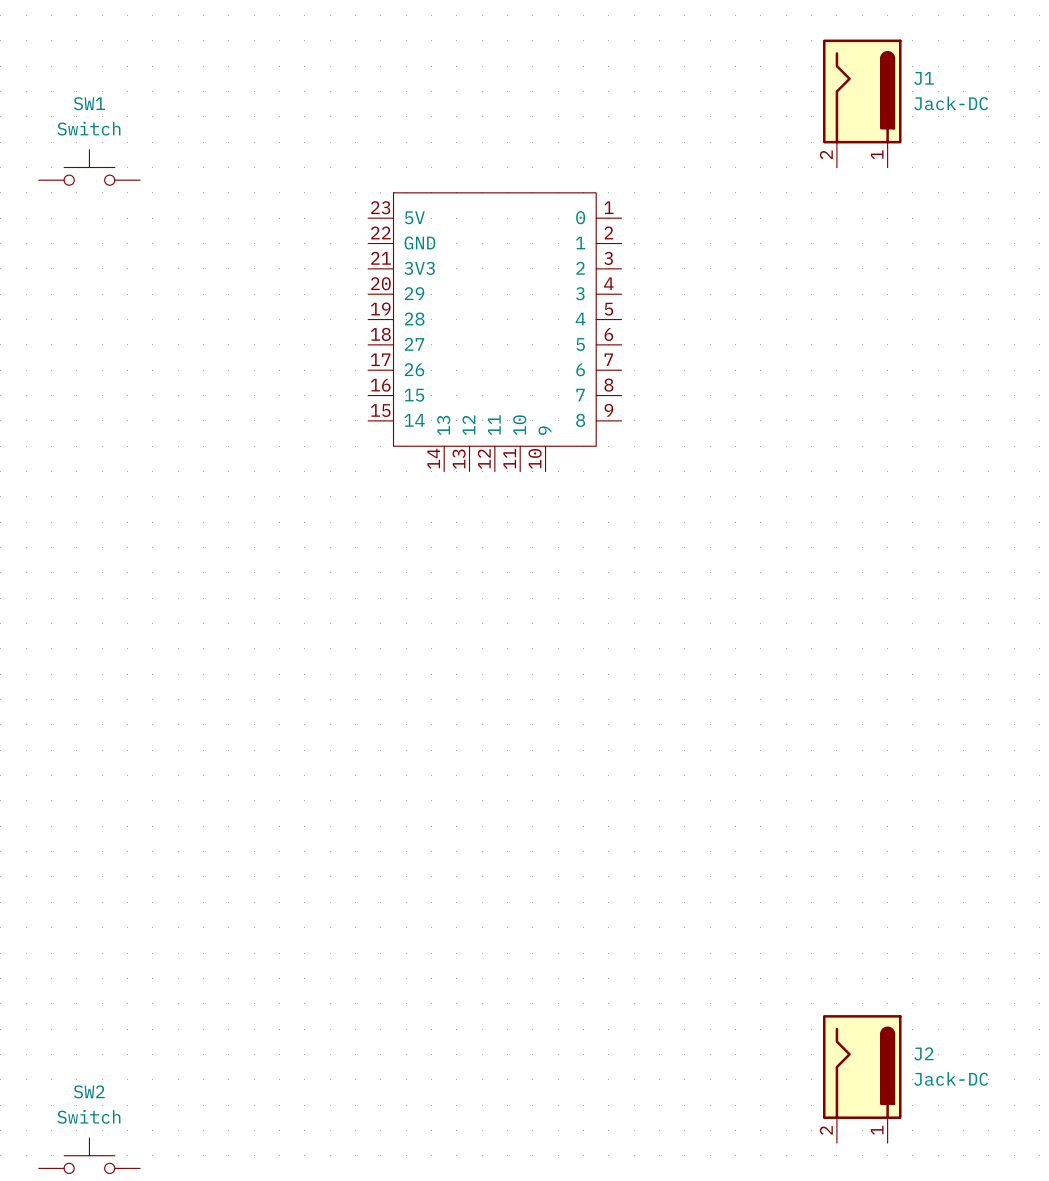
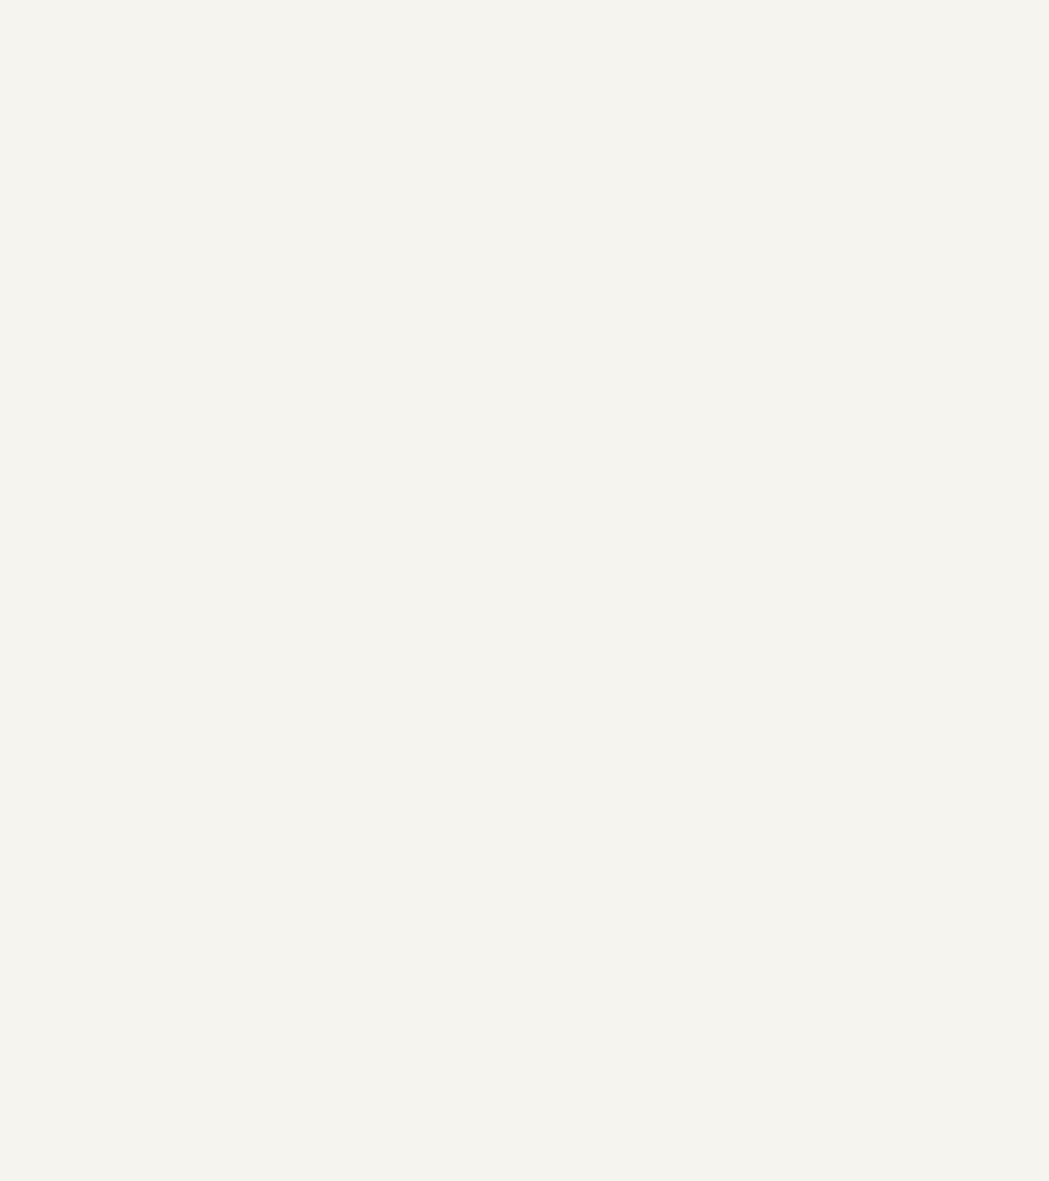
J1: Jack-DC (862, 103) -> none
SW1: Switch (89, 167) -> none
part: (494, 332) -> none
J2: Jack-DC (862, 1079) -> none
SW2: Switch (89, 1155) -> none

